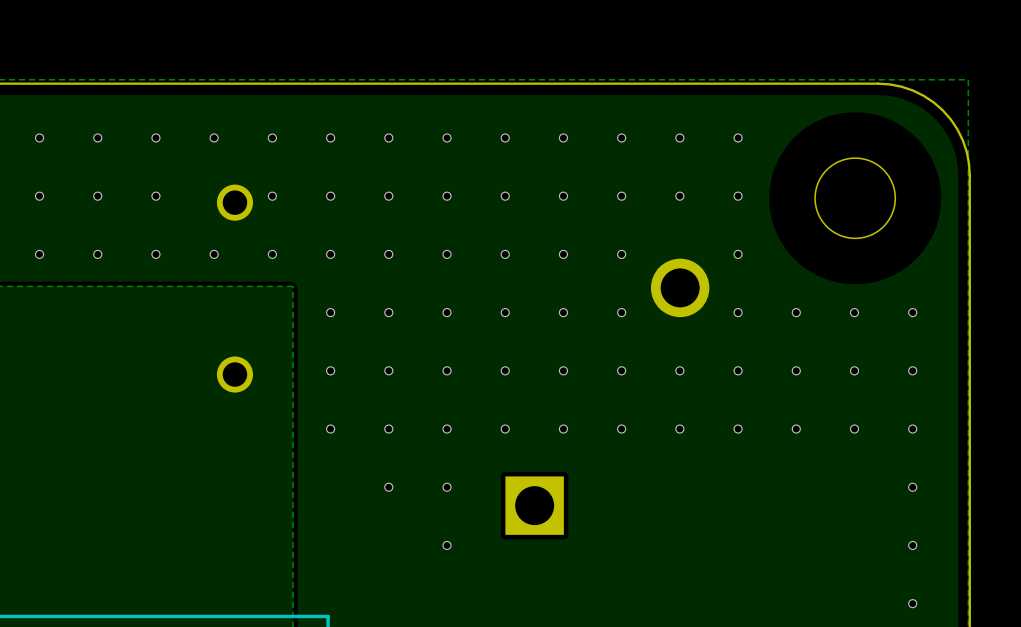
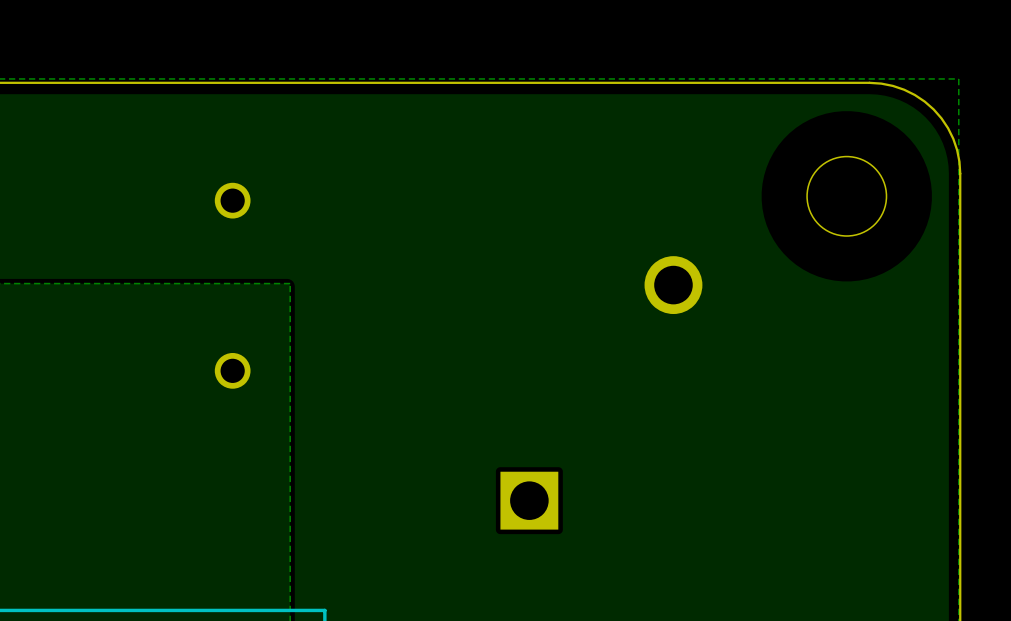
via: (39, 137) -> none
via: (97, 137) -> none
via: (155, 137) -> none
via: (214, 137) -> none
via: (272, 137) -> none
via: (330, 137) -> none
via: (388, 137) -> none
via: (447, 137) -> none
via: (505, 137) -> none
via: (563, 137) -> none
via: (621, 137) -> none
via: (679, 137) -> none
via: (738, 137) -> none
via: (39, 196) -> none
via: (97, 196) -> none
via: (155, 196) -> none
via: (272, 196) -> none
via: (330, 196) -> none
via: (388, 196) -> none
via: (447, 196) -> none
via: (505, 196) -> none
via: (563, 196) -> none
via: (621, 196) -> none
via: (679, 196) -> none
via: (738, 196) -> none
via: (39, 254) -> none
via: (97, 254) -> none
via: (155, 254) -> none
via: (214, 254) -> none
via: (272, 254) -> none
via: (330, 254) -> none
via: (388, 254) -> none
via: (447, 254) -> none
via: (505, 254) -> none
via: (563, 254) -> none
via: (621, 254) -> none
via: (738, 254) -> none
via: (330, 312) -> none
via: (388, 312) -> none
via: (447, 312) -> none
via: (505, 312) -> none
via: (563, 312) -> none
via: (621, 312) -> none
via: (738, 312) -> none
via: (796, 312) -> none
via: (854, 312) -> none
via: (912, 312) -> none
via: (330, 370) -> none
via: (388, 370) -> none
via: (447, 370) -> none
via: (505, 370) -> none
via: (563, 370) -> none
via: (621, 370) -> none
via: (679, 370) -> none
via: (738, 370) -> none
via: (796, 370) -> none
via: (854, 370) -> none
via: (912, 370) -> none
via: (330, 429) -> none
via: (388, 429) -> none
via: (447, 429) -> none
via: (505, 429) -> none
via: (563, 429) -> none
via: (621, 429) -> none
via: (679, 429) -> none
via: (738, 429) -> none
via: (796, 429) -> none
via: (854, 429) -> none
via: (912, 429) -> none
via: (388, 487) -> none
via: (447, 487) -> none
via: (912, 487) -> none
via: (447, 545) -> none
via: (912, 545) -> none
via: (912, 603) -> none

